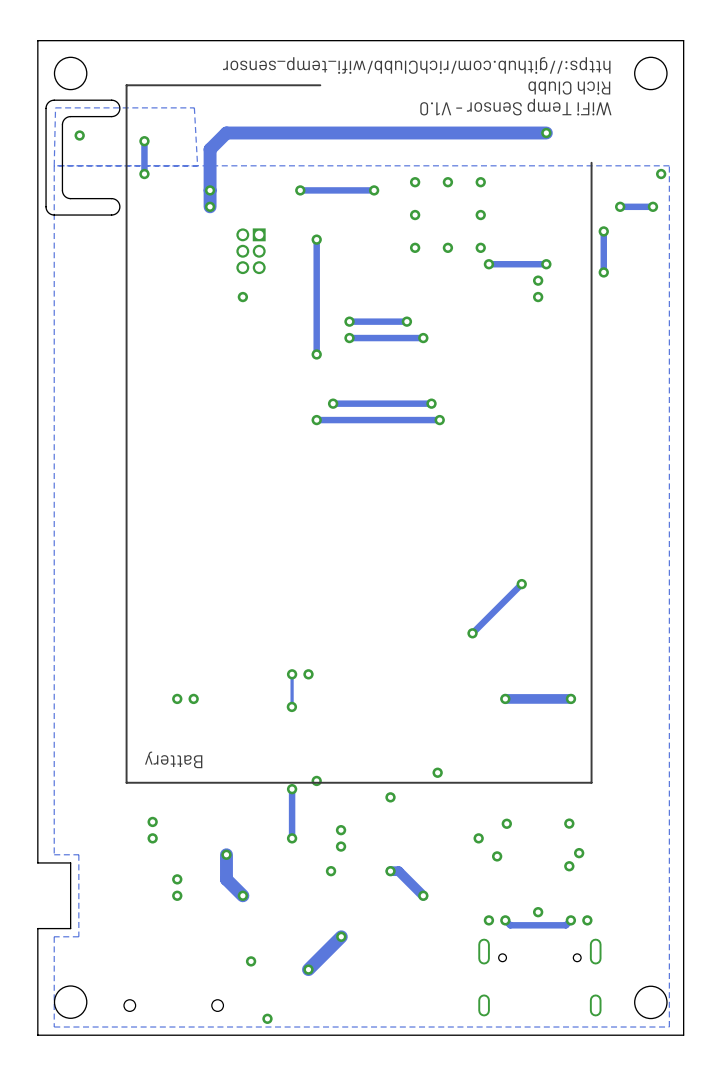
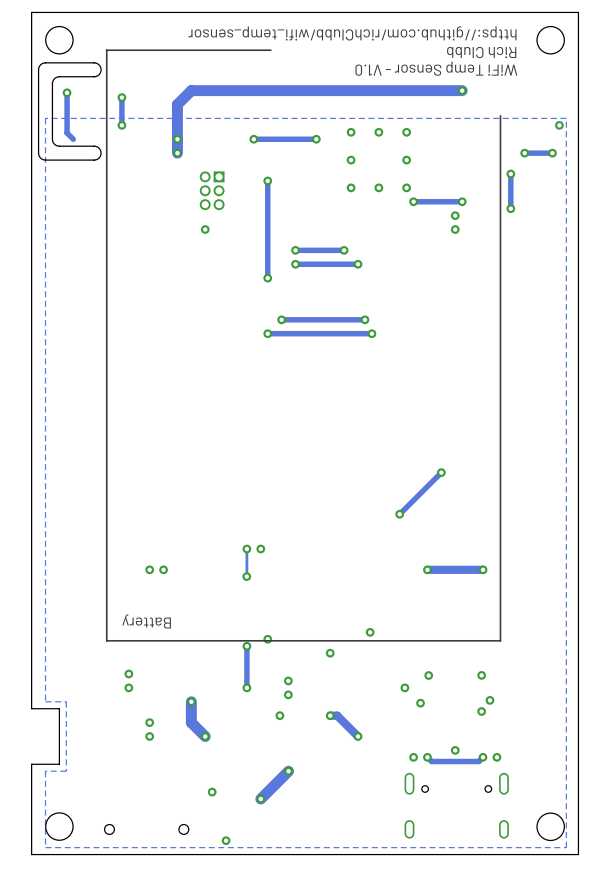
zone outline: (194, 107) (55, 107) (54, 165) (197, 166) (194, 107) -> none
track: none -> (67, 92) (67, 133) (73, 139)

